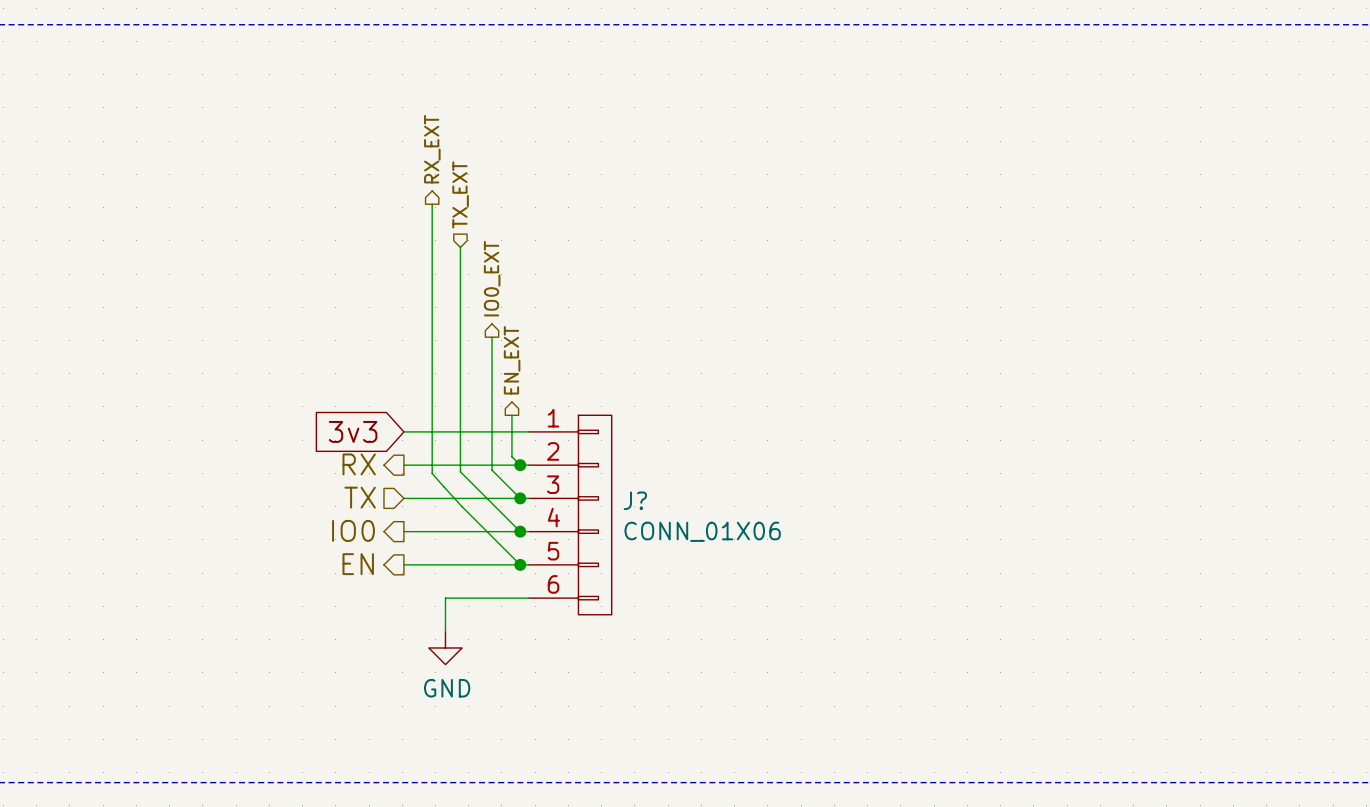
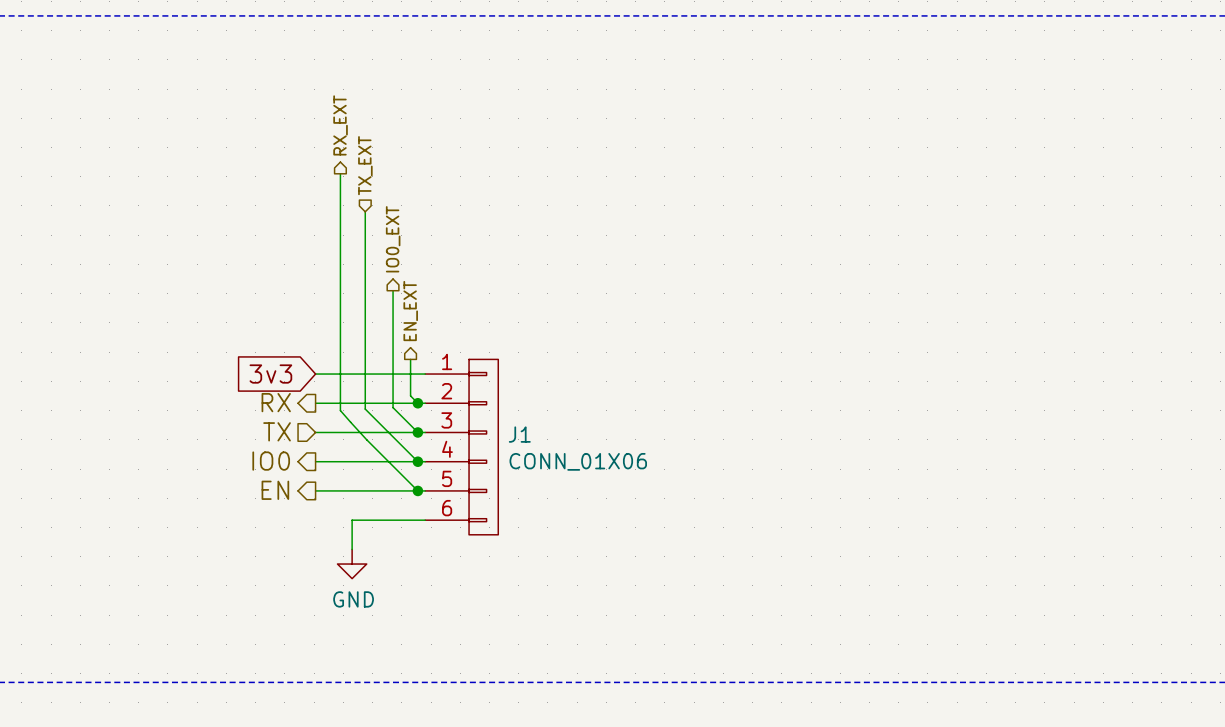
J? name: J? (635, 500) -> J1 (519, 434)

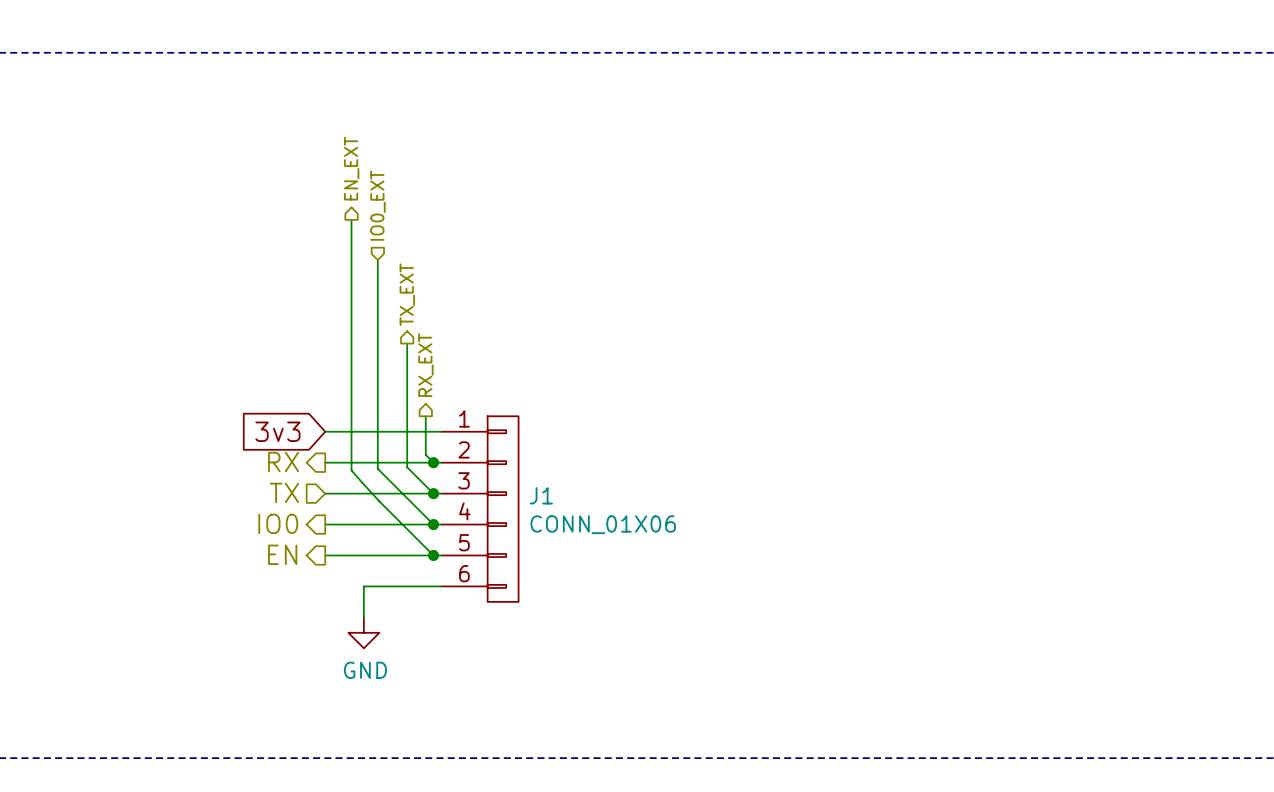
hierarchical label: RX_EXT (340, 125) -> EN_EXT (351, 168)
hierarchical label: TX_EXT (365, 165) -> IO0_EXT (377, 205)
hierarchical label: IO0_EXT (393, 239) -> TX_EXT (407, 294)
hierarchical label: EN_EXT (410, 311) -> RX_EXT (425, 365)

